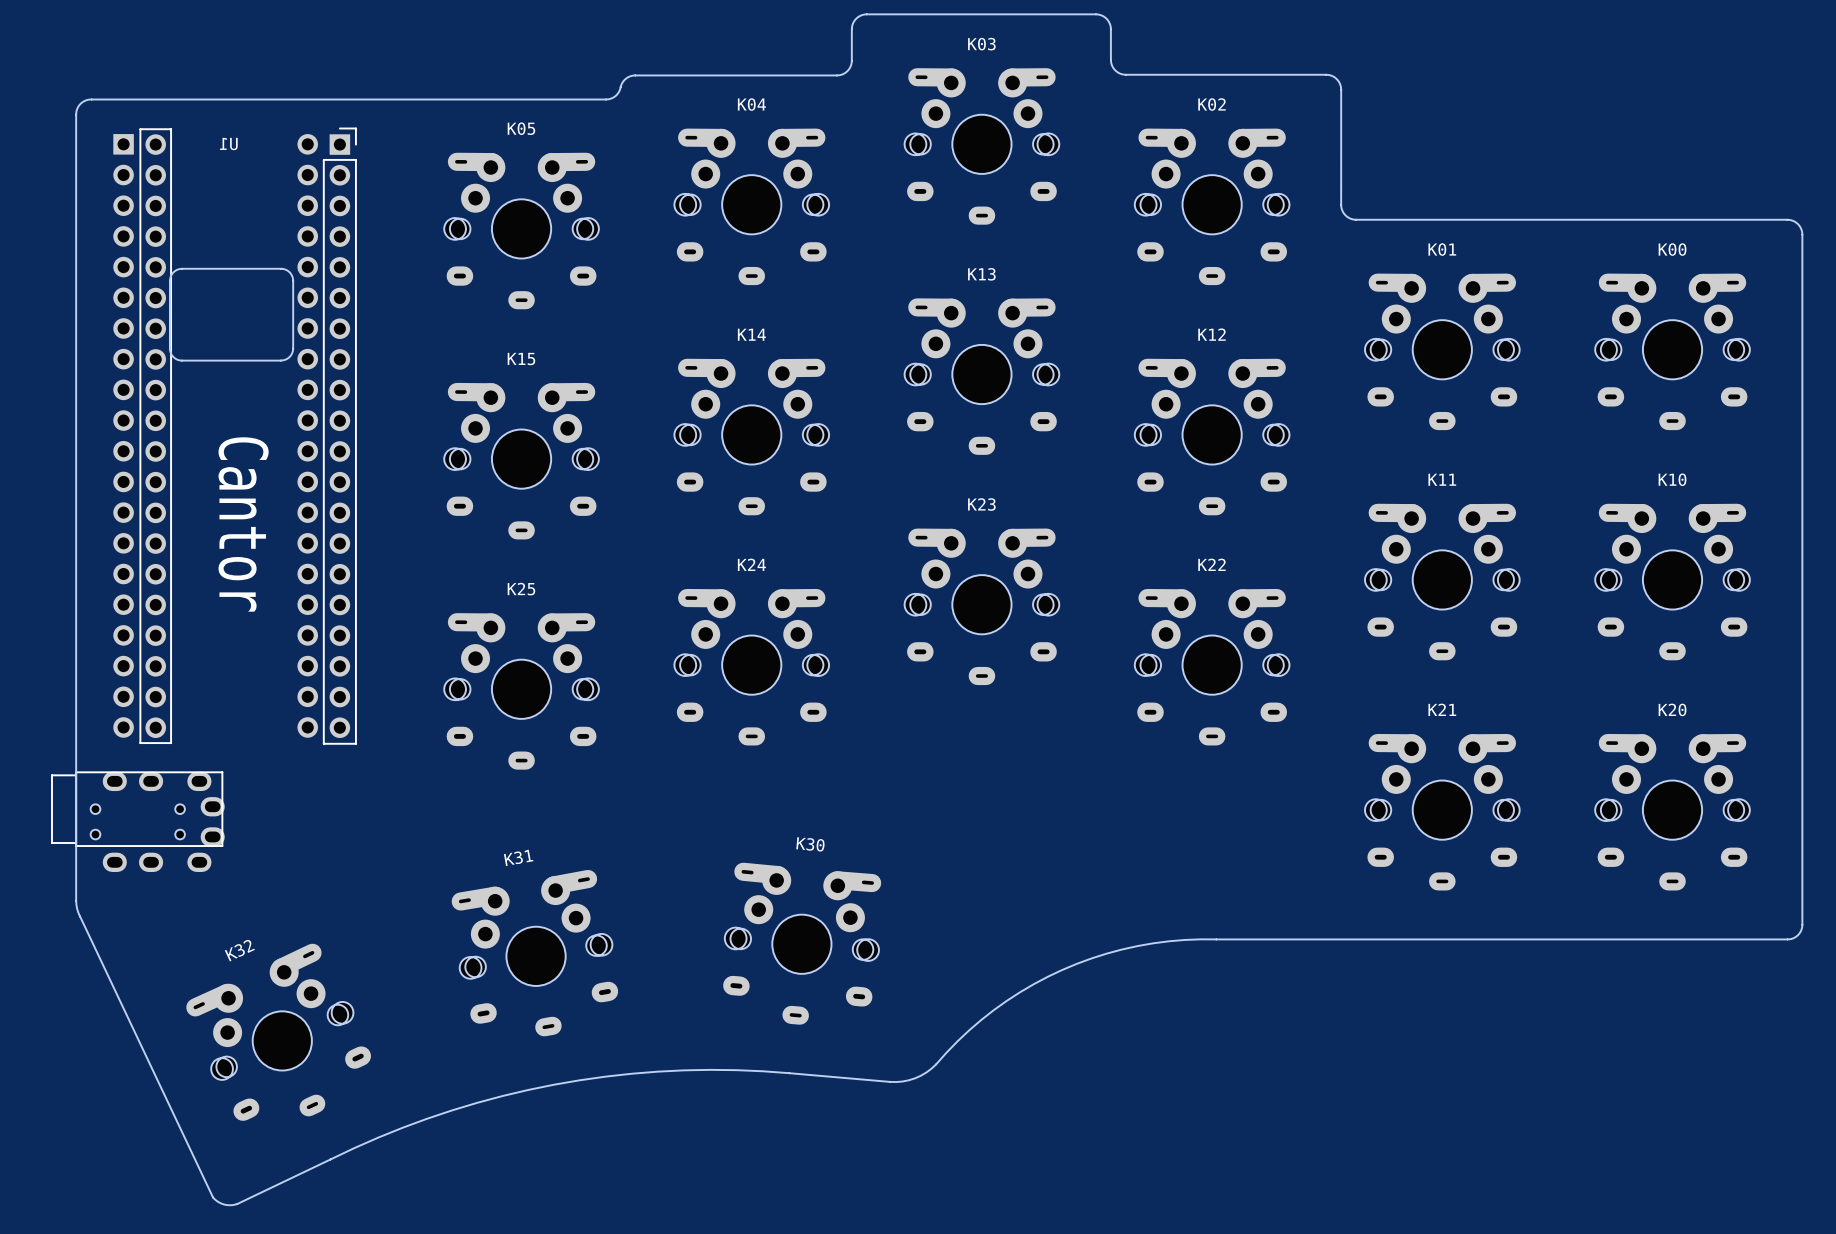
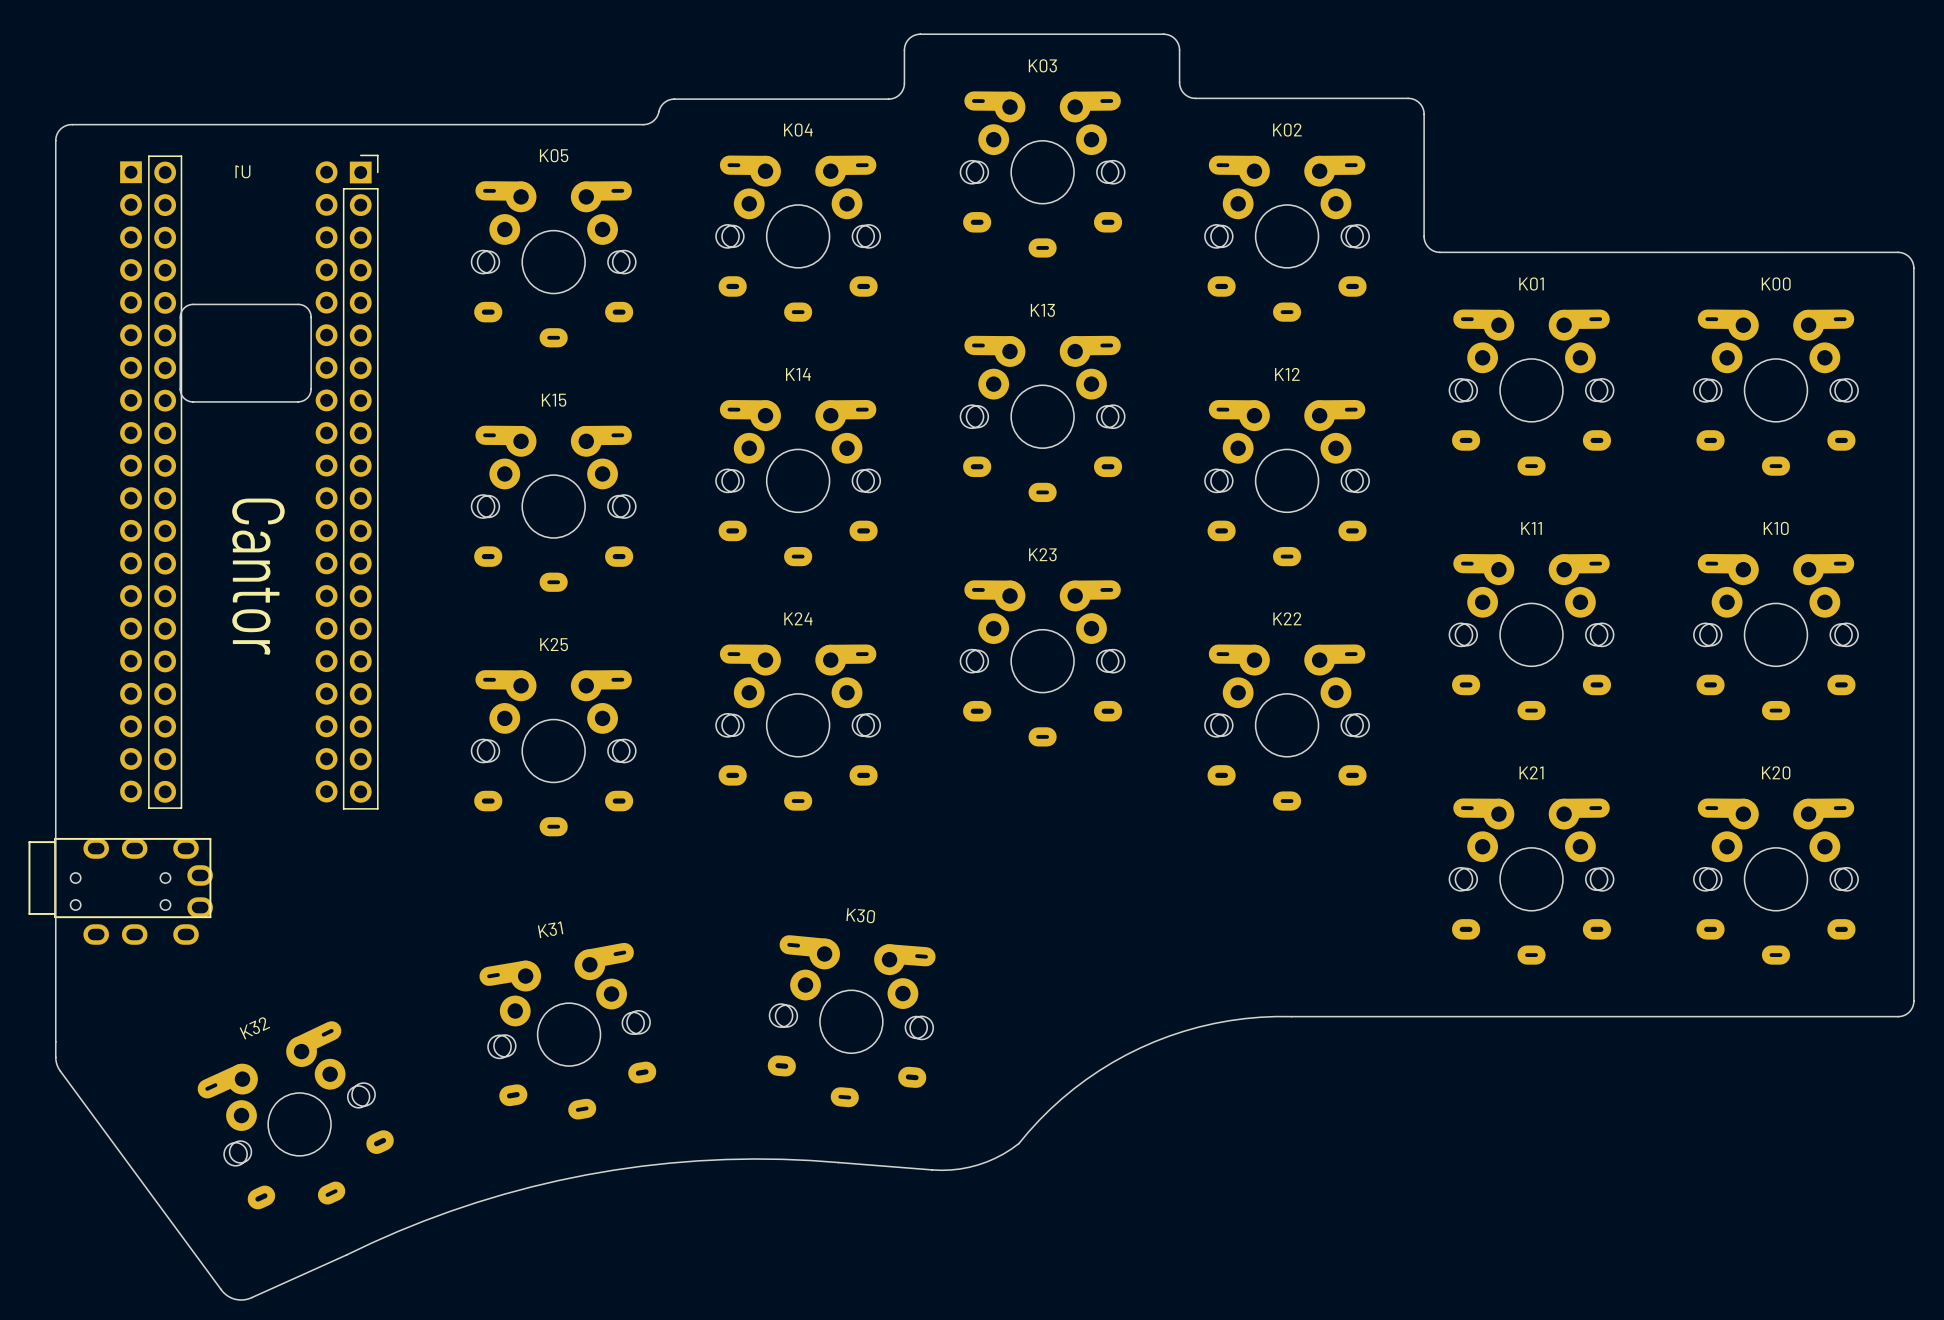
board edge: (91, 99) (80, 103) (76, 114) (76, 901) (80, 916) -> none
part position: (137, 821) -> (120, 891)
board edge: (80, 916) (213, 1197) (221, 1203) (229, 1205) (237, 1203) (354, 1148) (402, 1127) (477, 1102) (553, 1084) (631, 1073) (710, 1069) (763, 1071) (889, 1081) (908, 1080) (931, 1068) (969, 1030) (993, 1010) (1020, 992) (1062, 970) (1106, 953) (1137, 946) (1168, 941) (1216, 939) -> (97, 124) (65, 126) (58, 131) (55, 140) (55, 1059) (60, 1071) (226, 1295) (237, 1299) (249, 1298) (397, 1231) (450, 1211) (531, 1186) (586, 1174) (641, 1166) (726, 1159) (810, 1160) (941, 1170) (969, 1167) (995, 1158) (1011, 1149) (1018, 1143) (1050, 1109) (1074, 1088) (1112, 1062) (1140, 1048) (1169, 1036) (1214, 1023) (1260, 1017) (1291, 1016)

